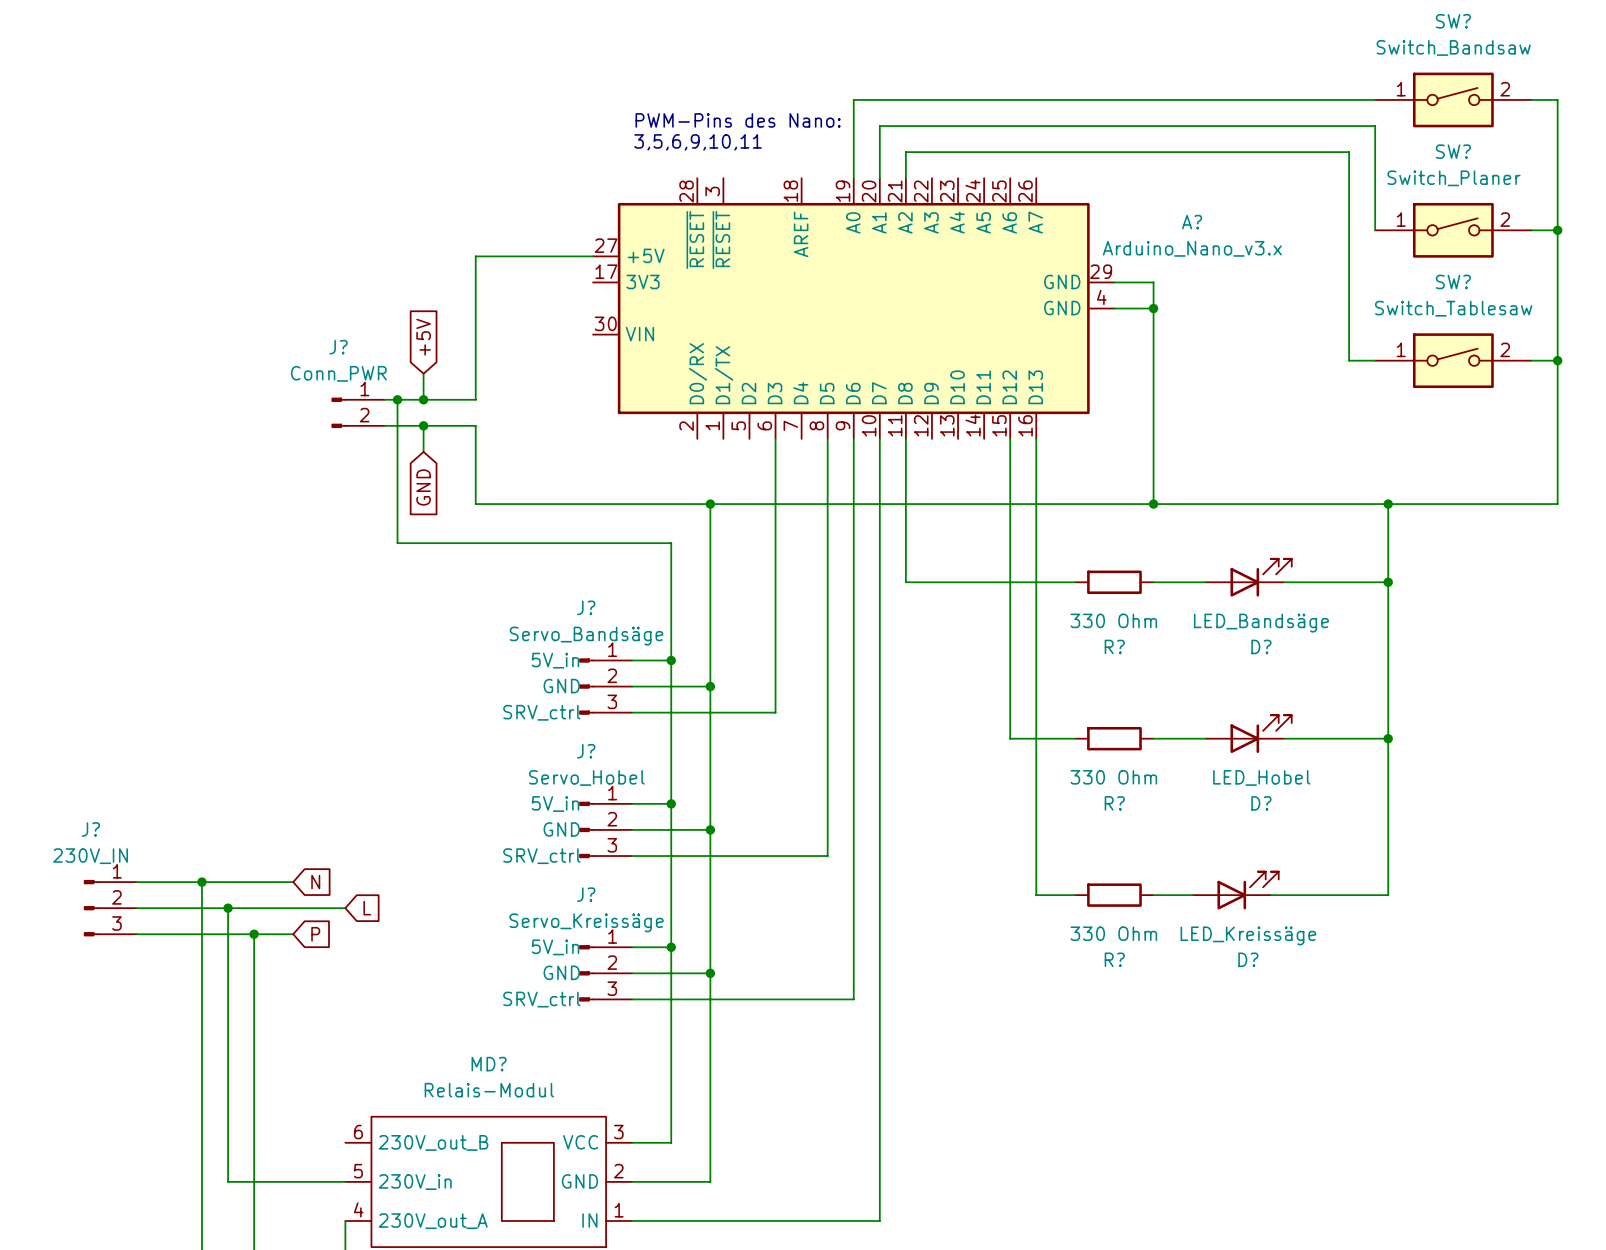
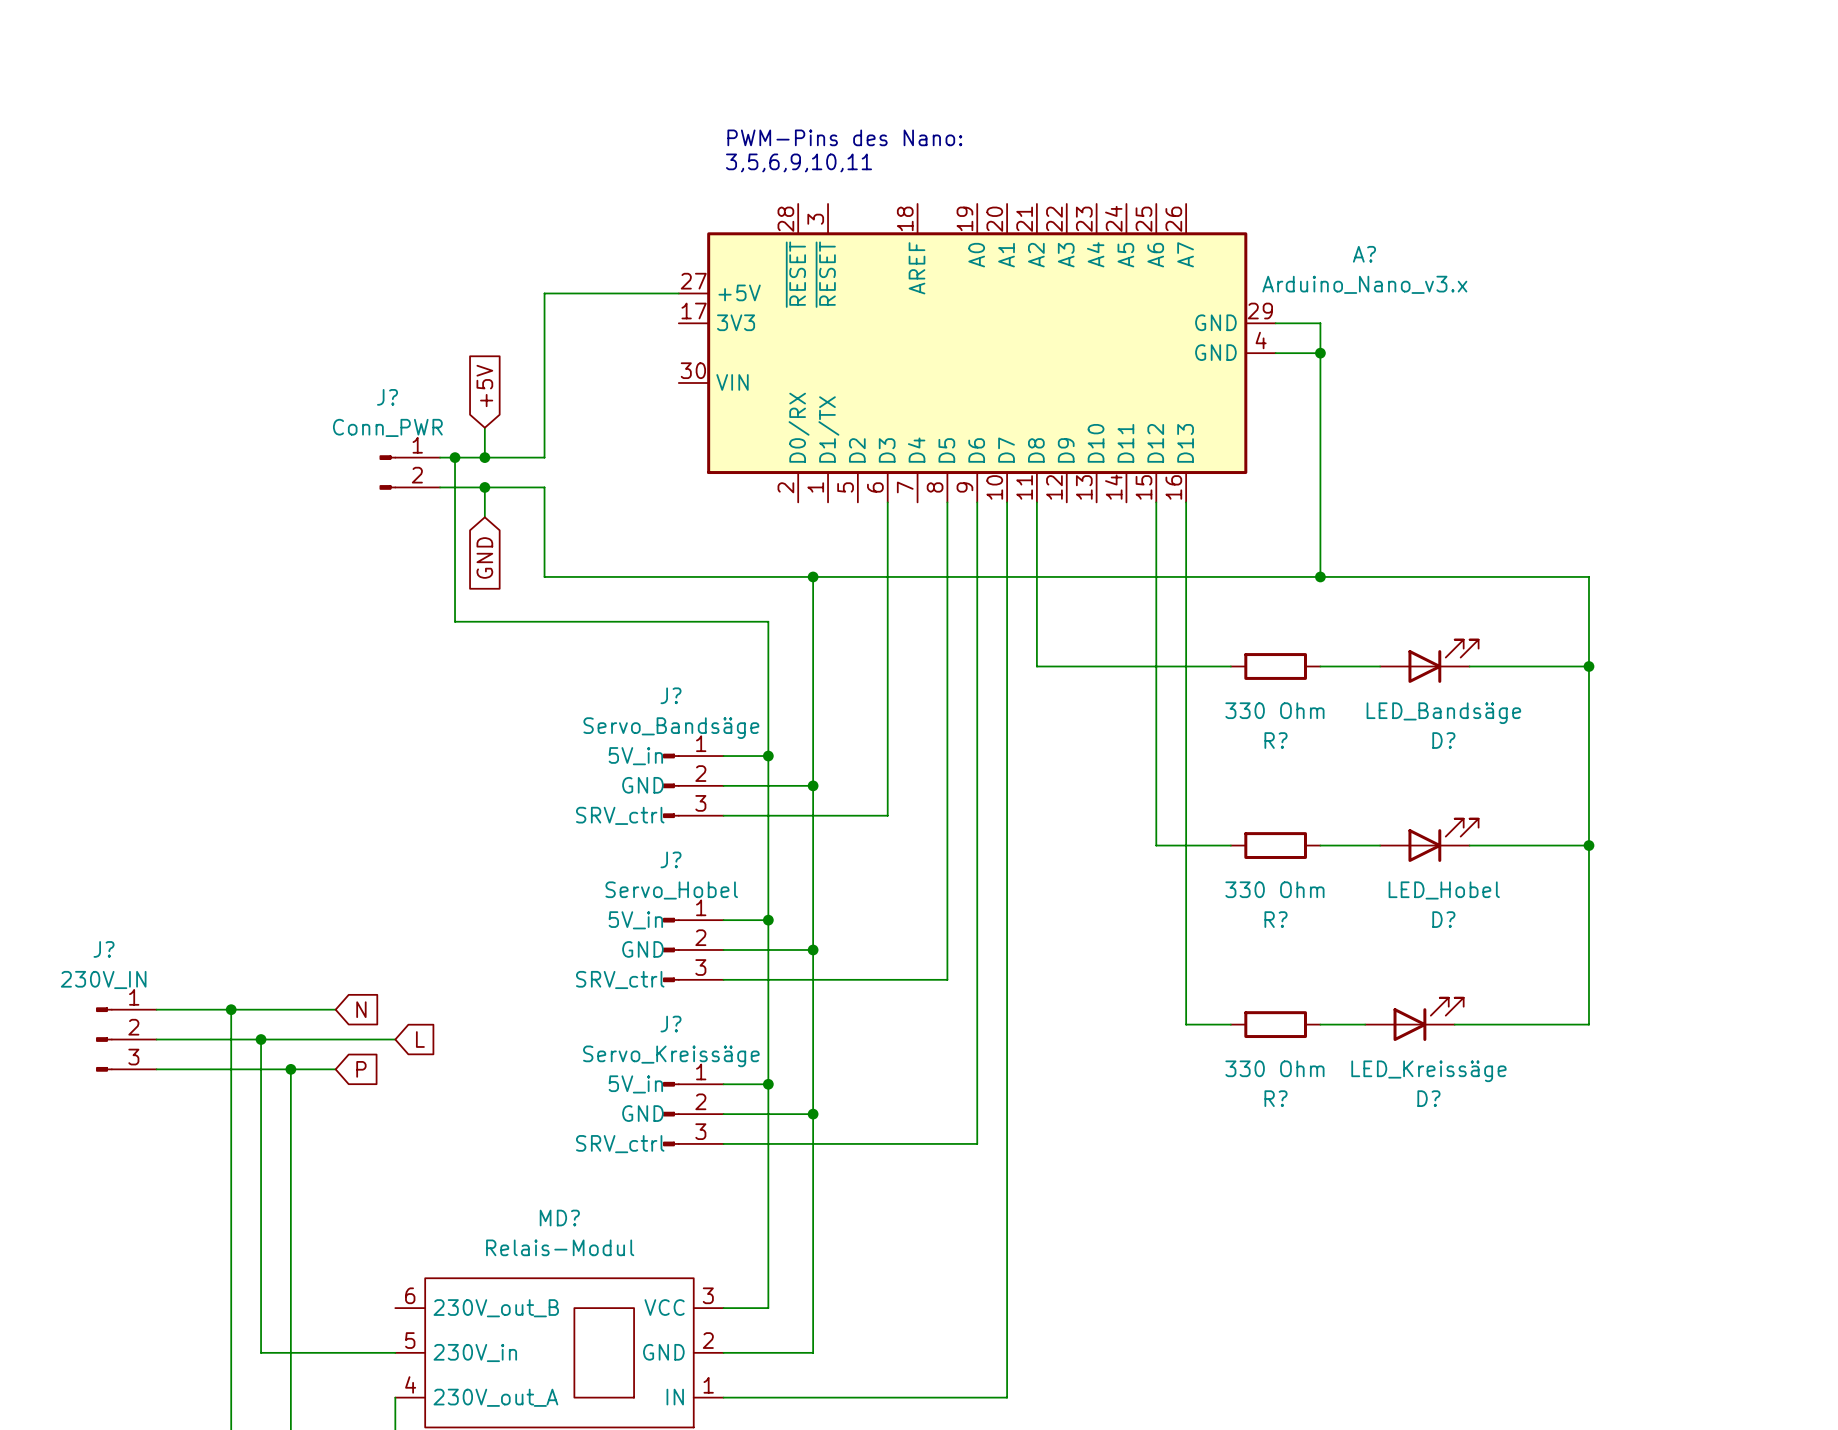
wire: (1375, 99) (853, 99) (853, 178) -> none
SW?: Switch_Bandsaw (1453, 99) -> none
wire: (1531, 99) (1557, 99) (1557, 504) (1388, 504) -> none
wire: (879, 178) (879, 126) (1375, 126) (1375, 230) -> none
wire: (905, 178) (905, 152) (1349, 152) (1349, 360) (1375, 360) -> none
SW?: Switch_Planer (1453, 230) -> none
wire: (1531, 230) (1557, 230) -> none
junction: (1557, 230) -> none
SW?: Switch_Tablesaw (1453, 360) -> none
wire: (1531, 360) (1557, 360) -> none
junction: (1557, 360) -> none
junction: (1388, 504) -> none

